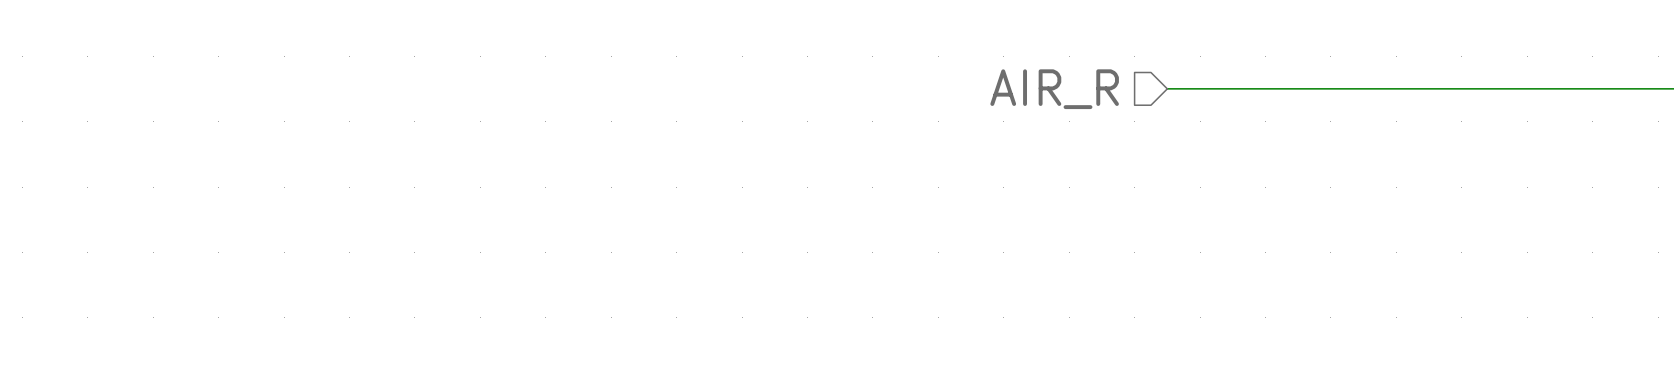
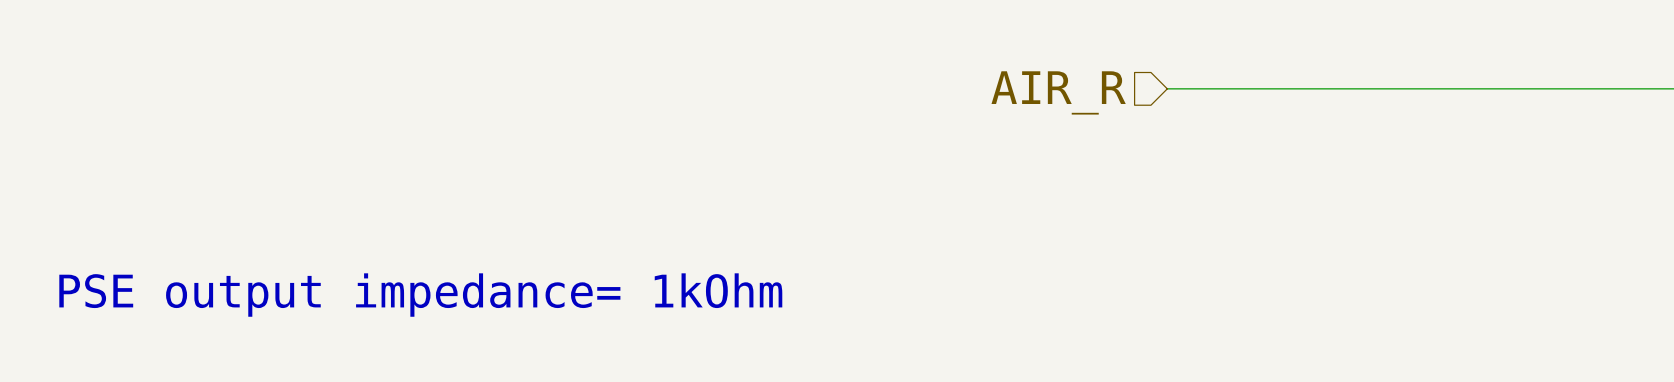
text: none -> PSE output impedance= 1kOhm (420, 295)

